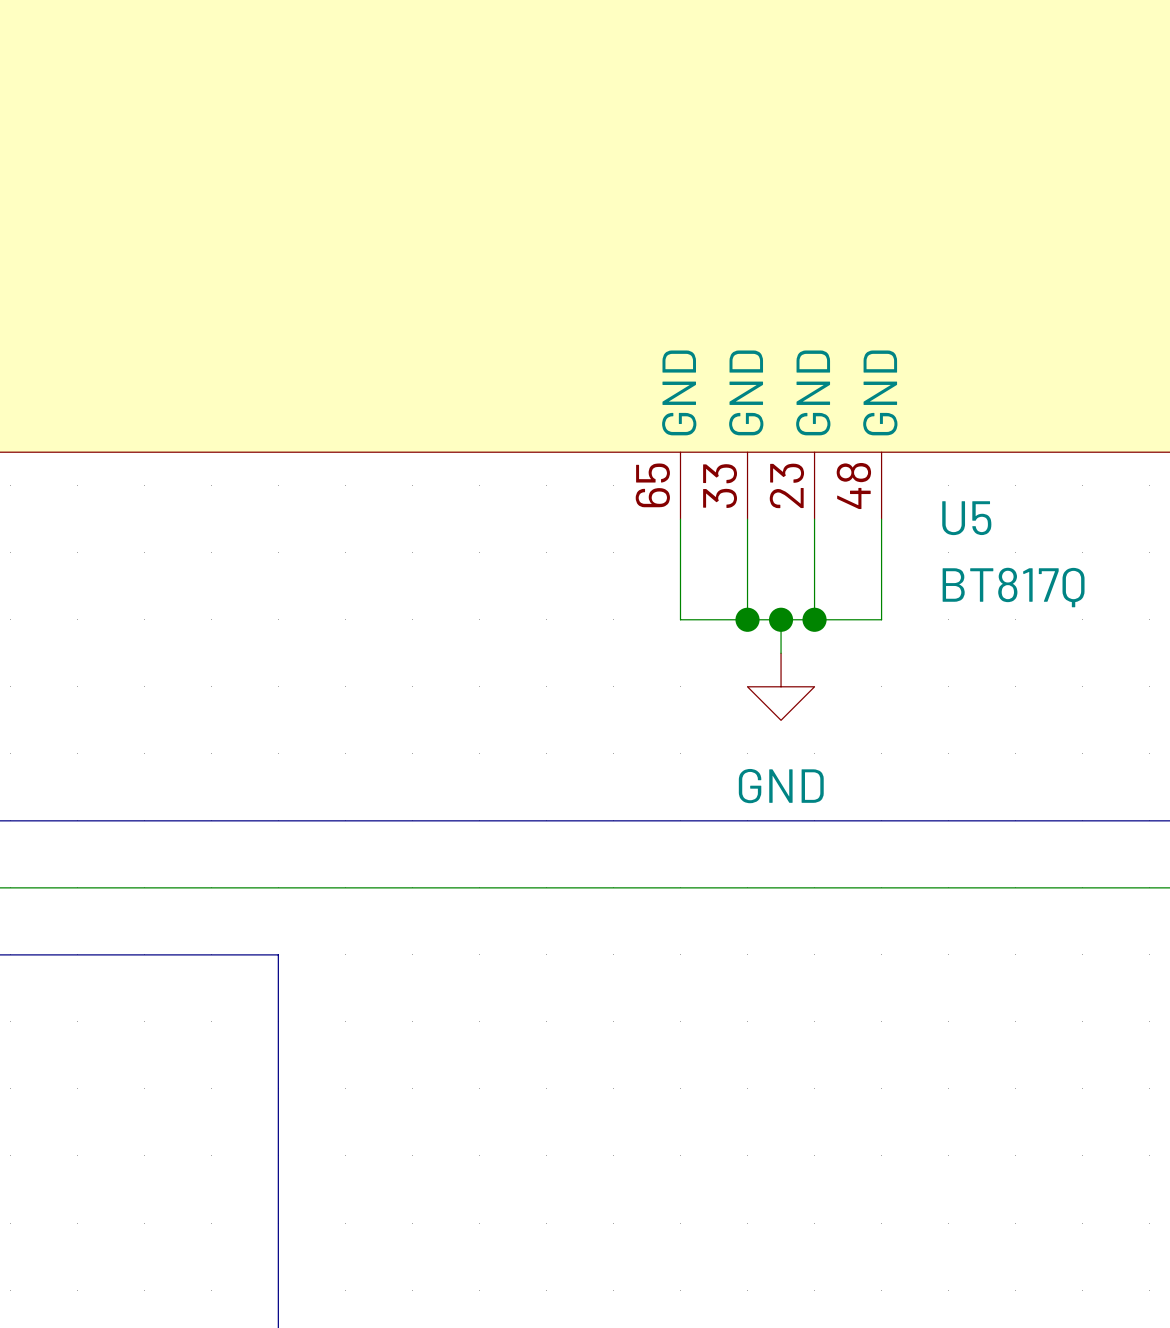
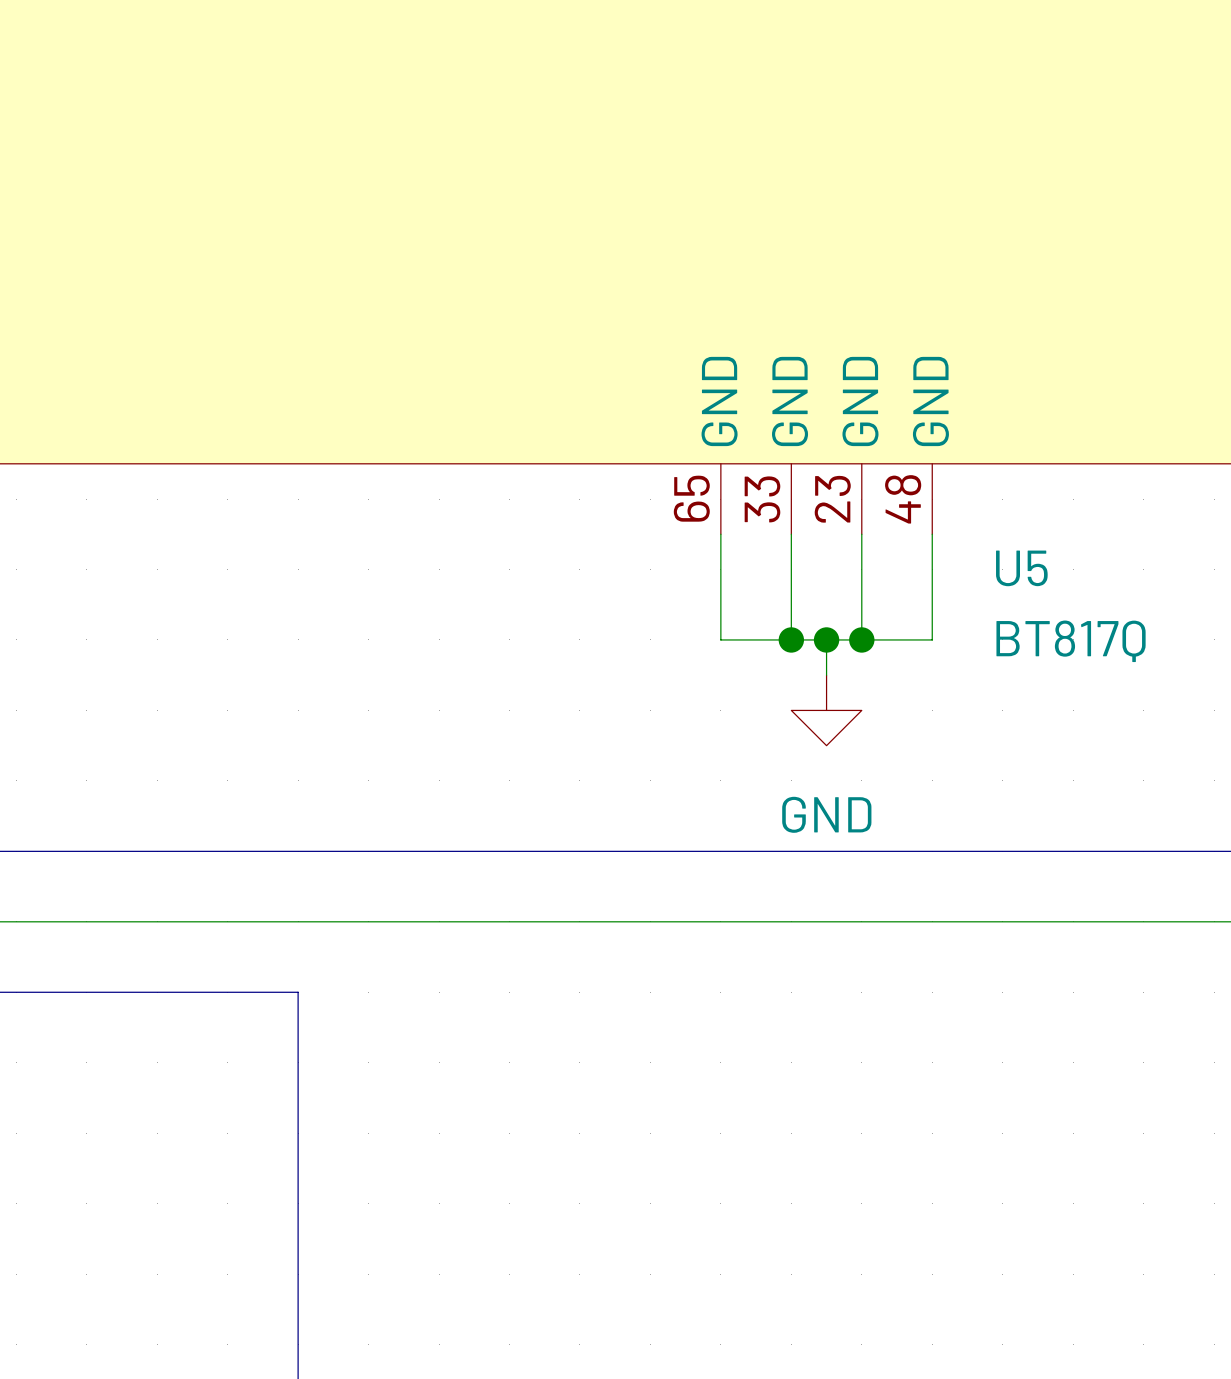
U5 name position: U5 (966, 518) -> U5 (1021, 568)
U5 value position: BT817Q (1013, 587) -> BT817Q (1071, 641)

